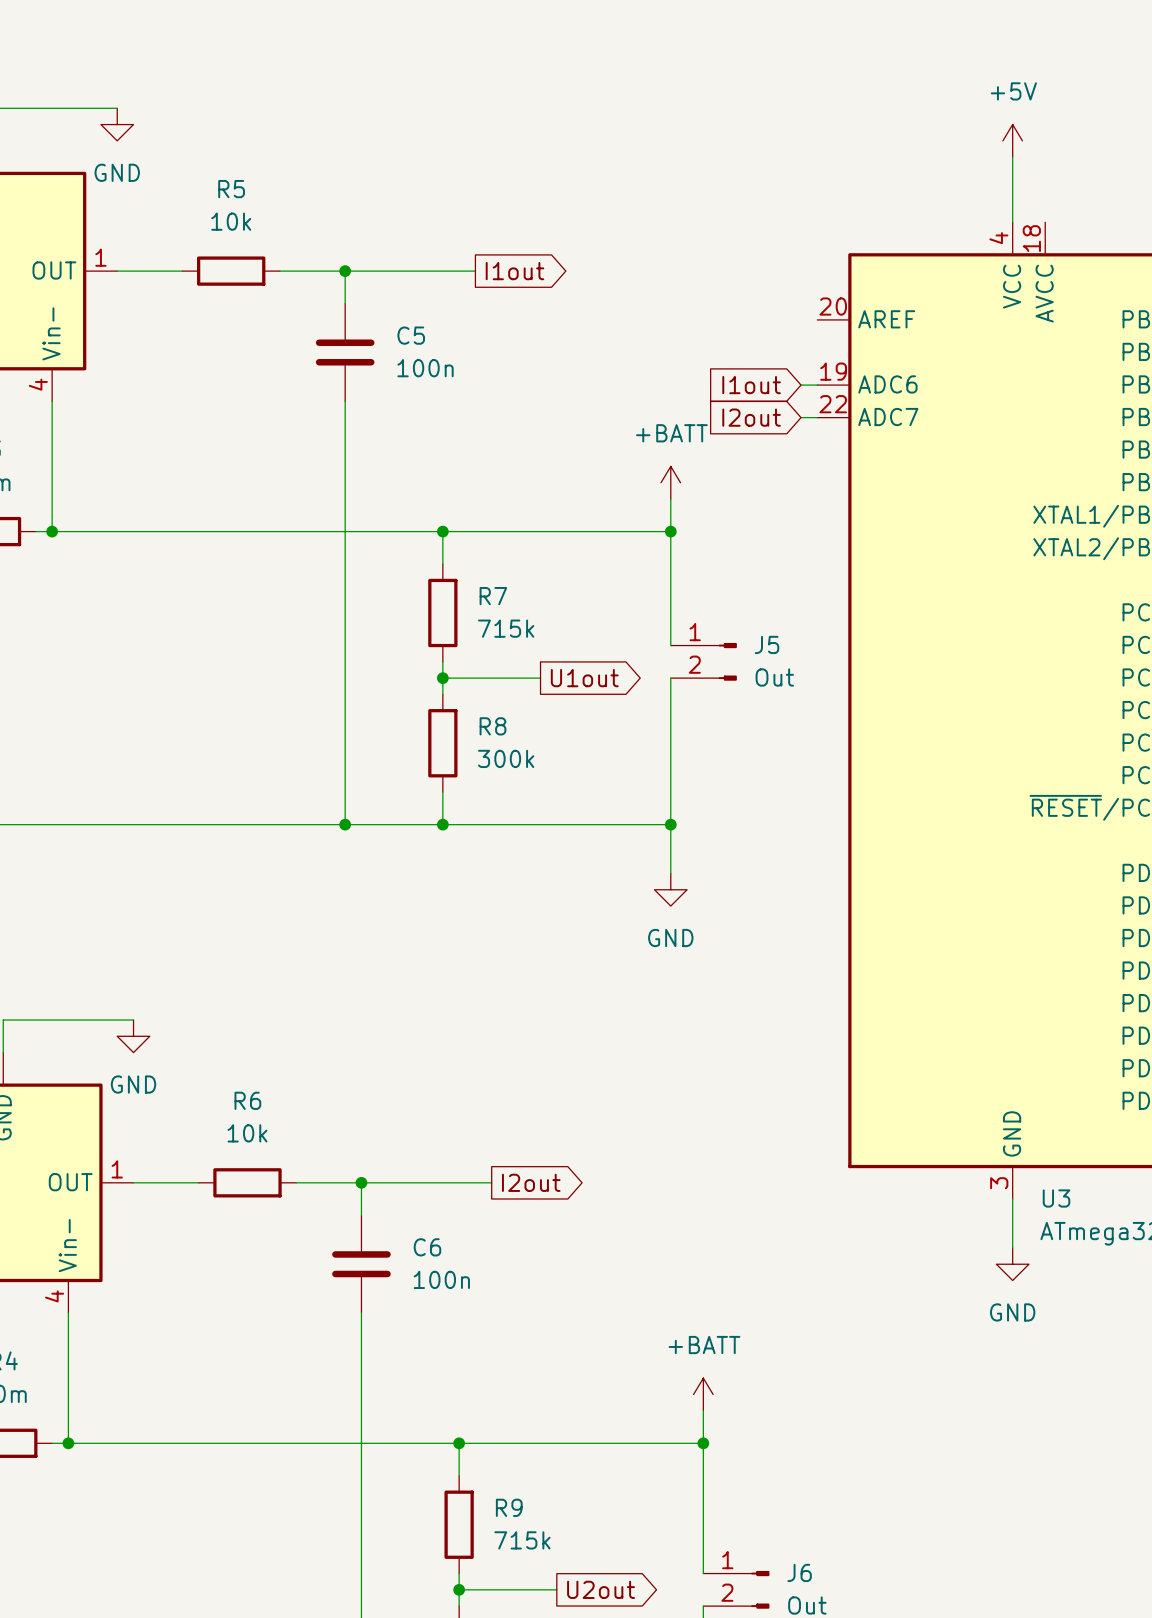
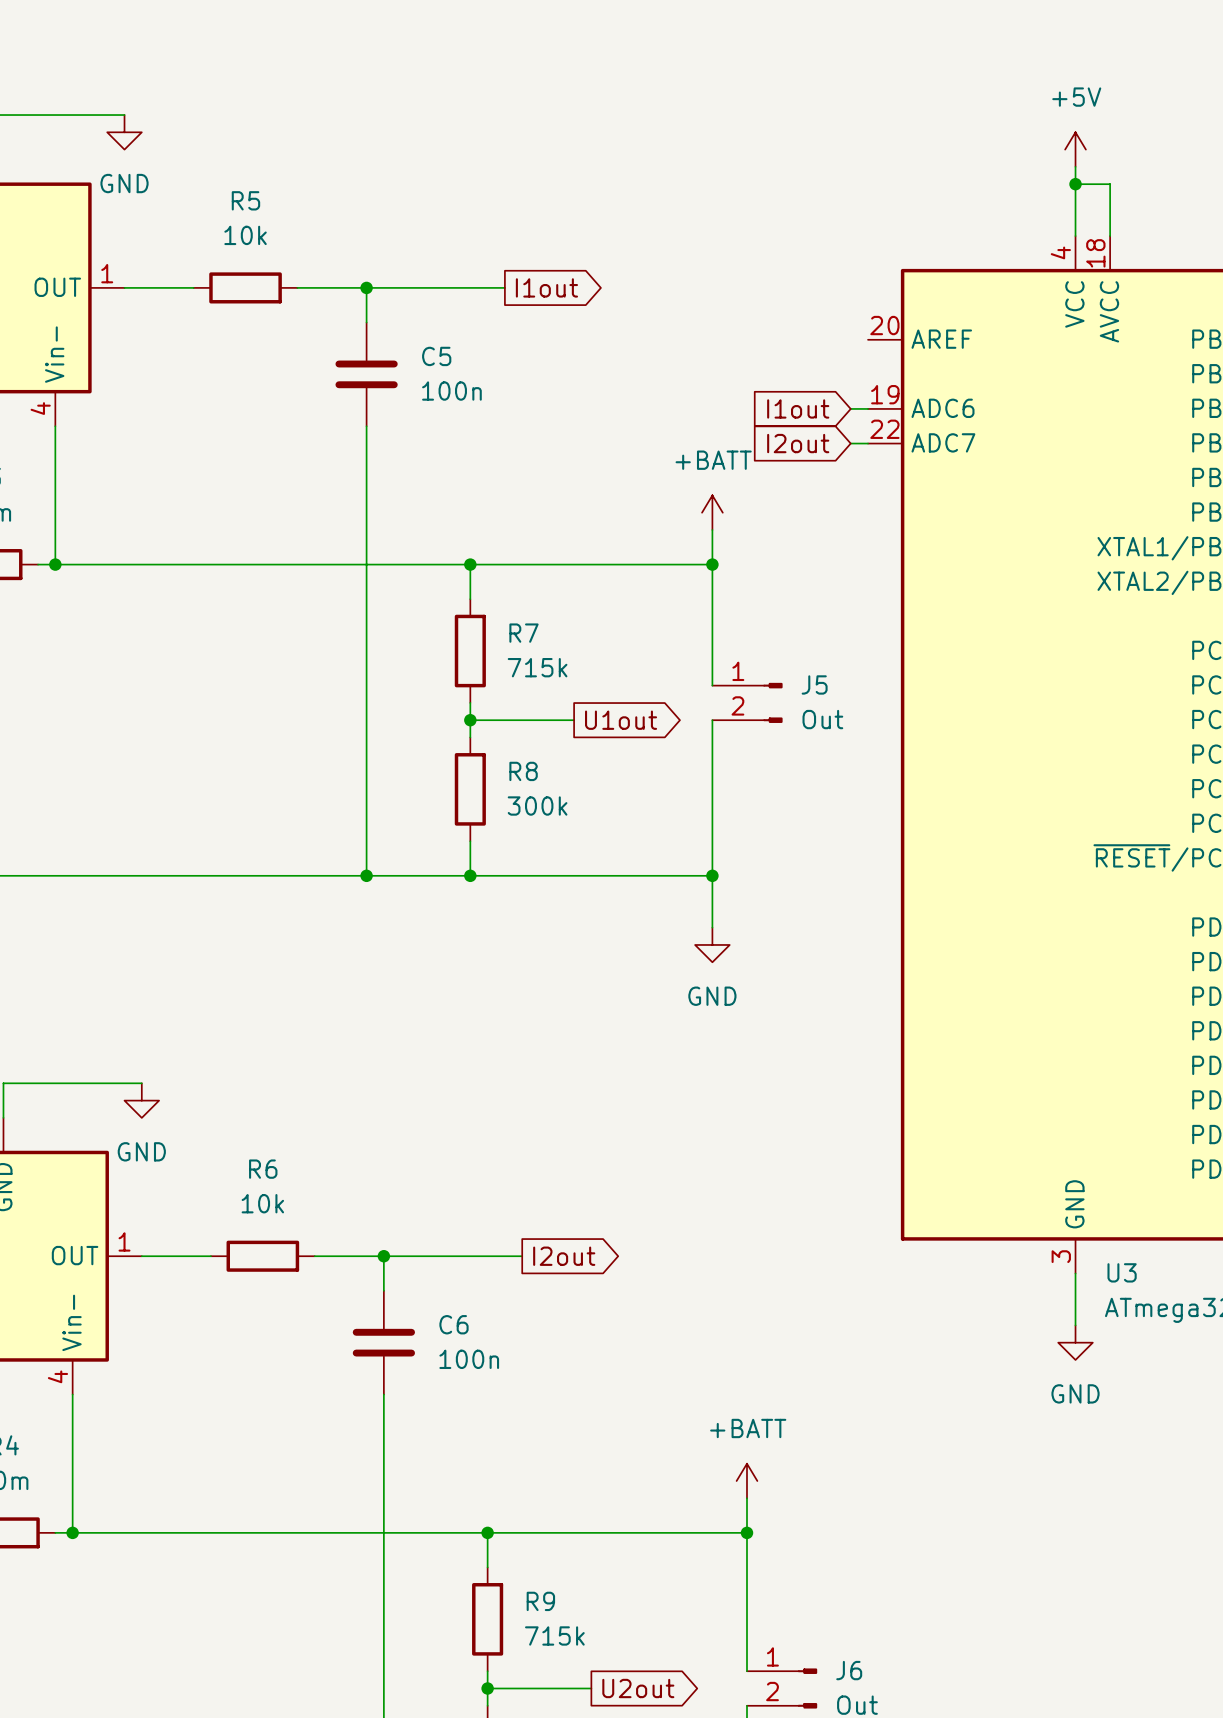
wire: none -> (1075, 184) (1110, 184) (1110, 236)
junction: none -> (1075, 184)

